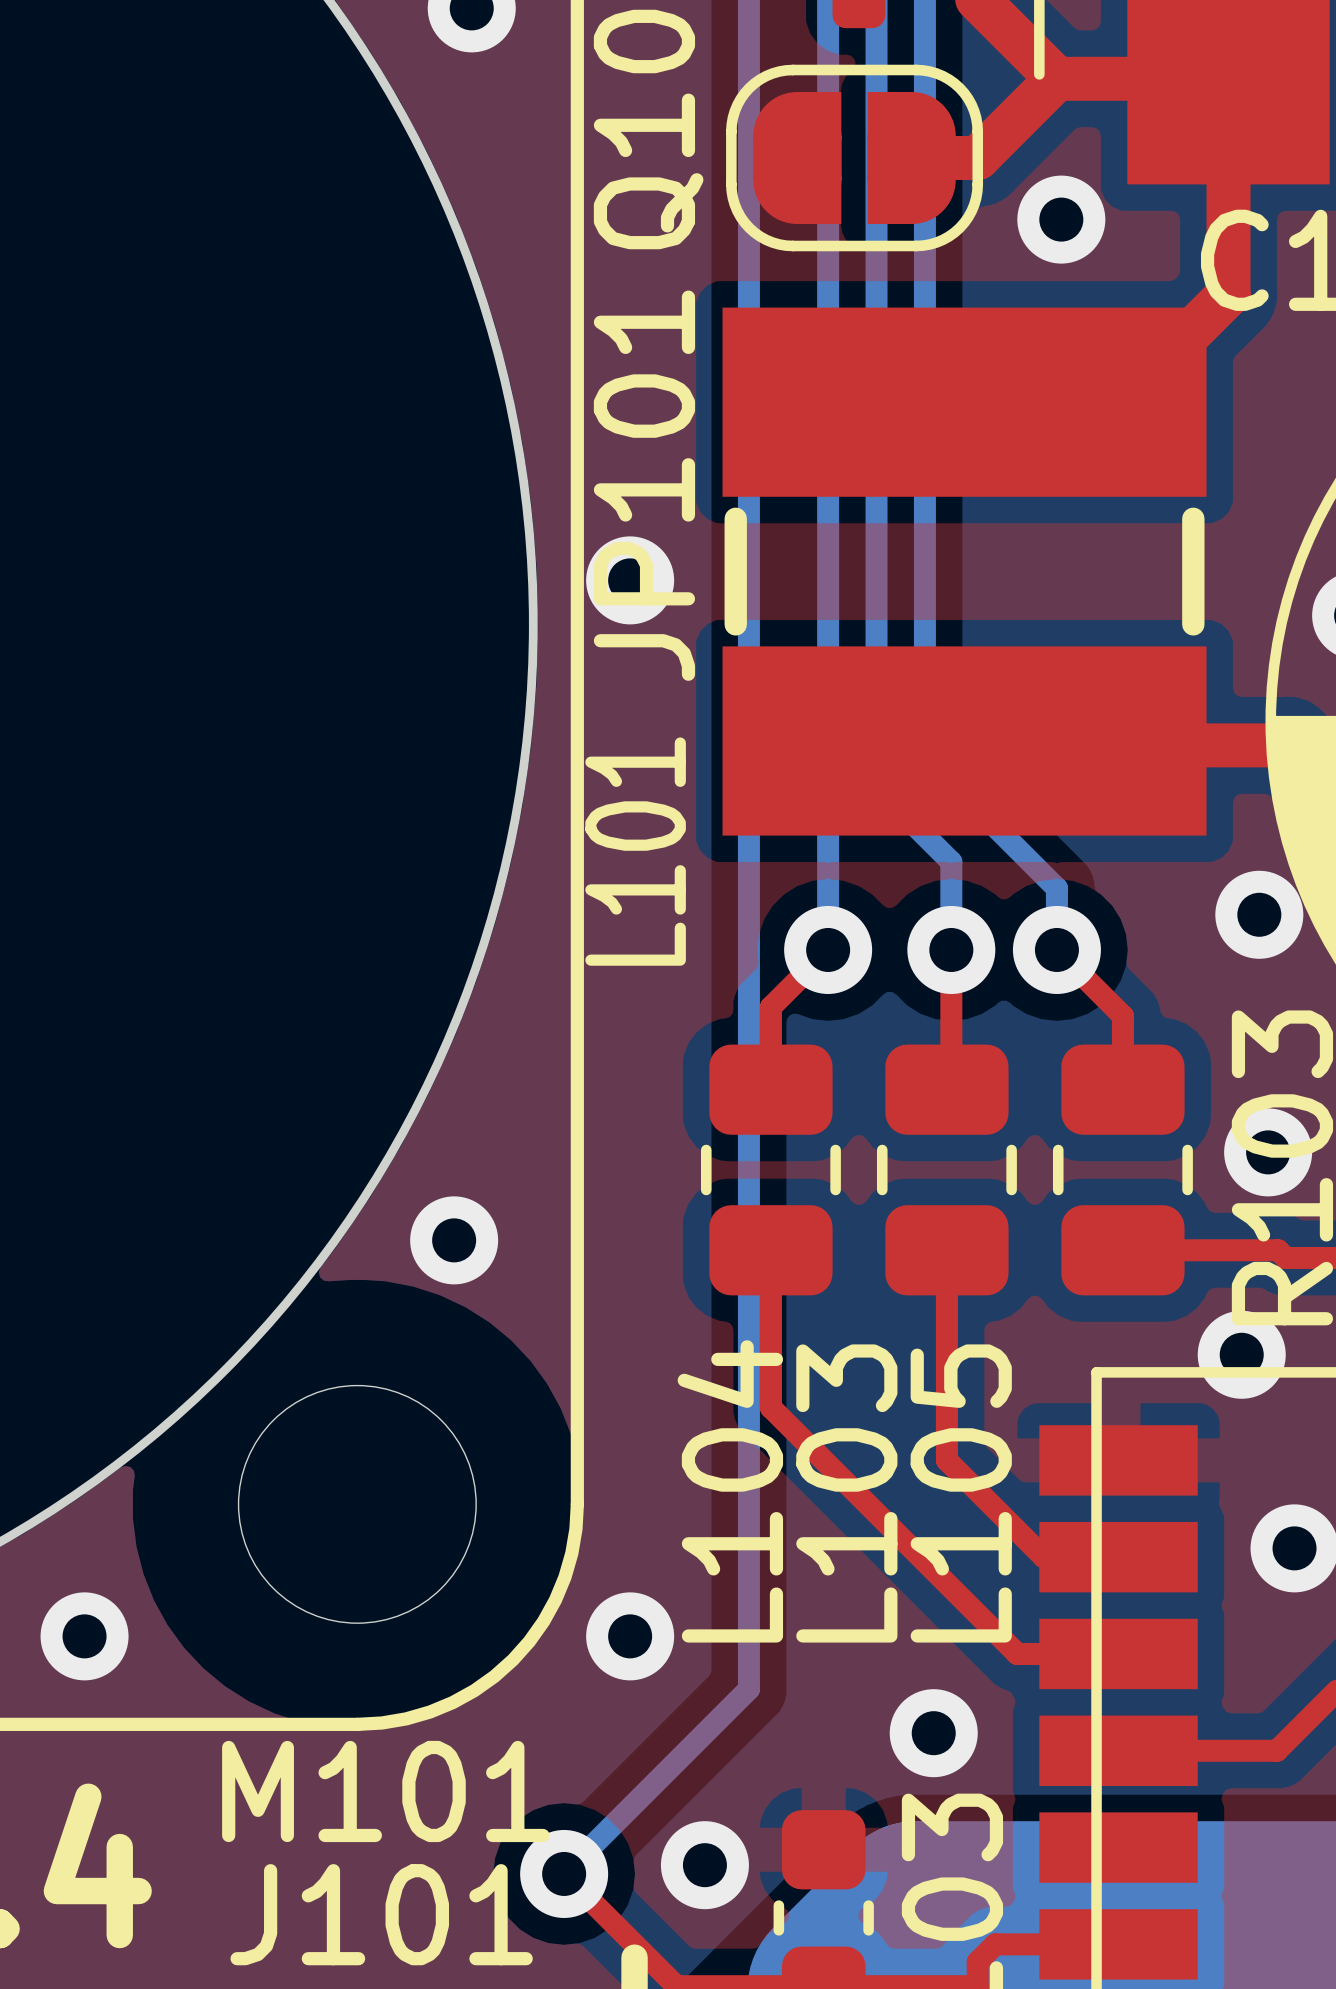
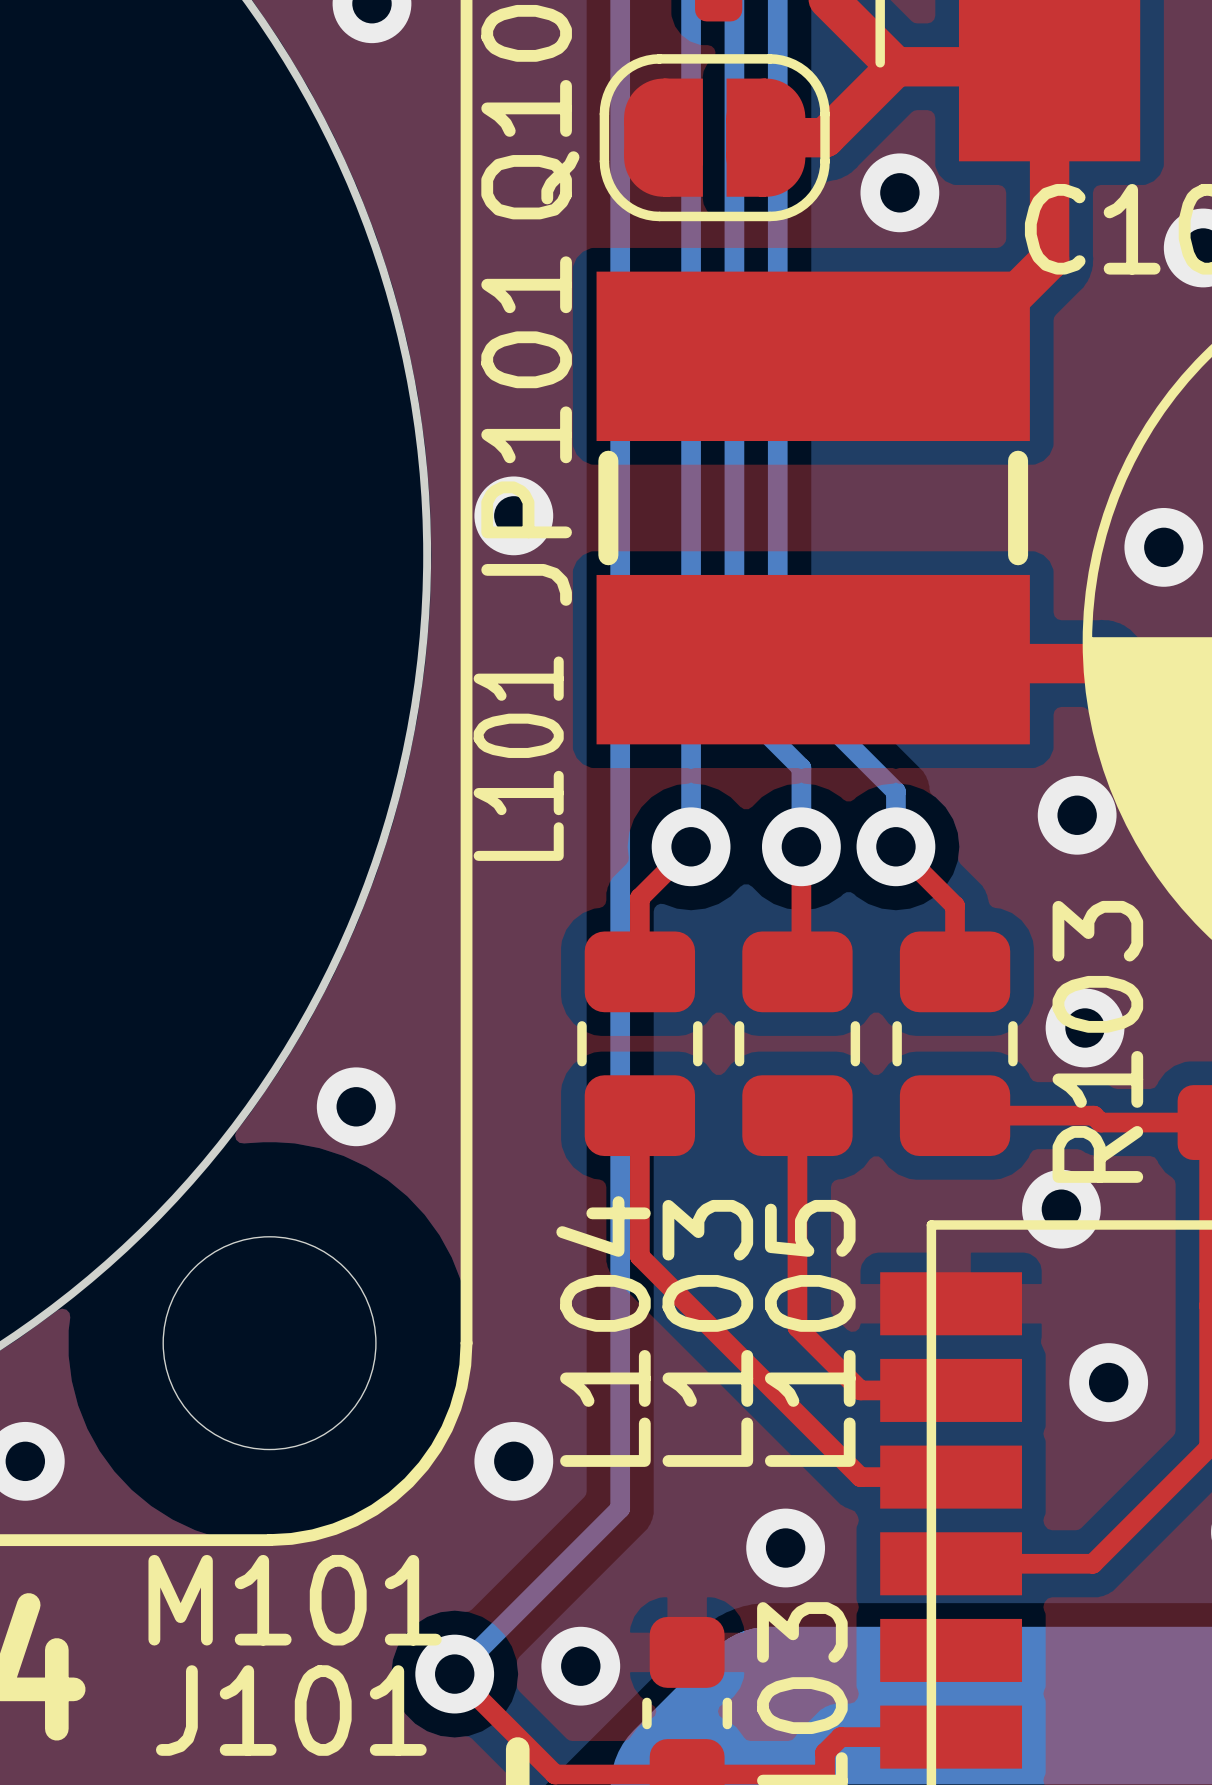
top track: (946, 1460) (1043, 1557) -> (797, 1303) (797, 1327) (860, 1390) (884, 1390)

